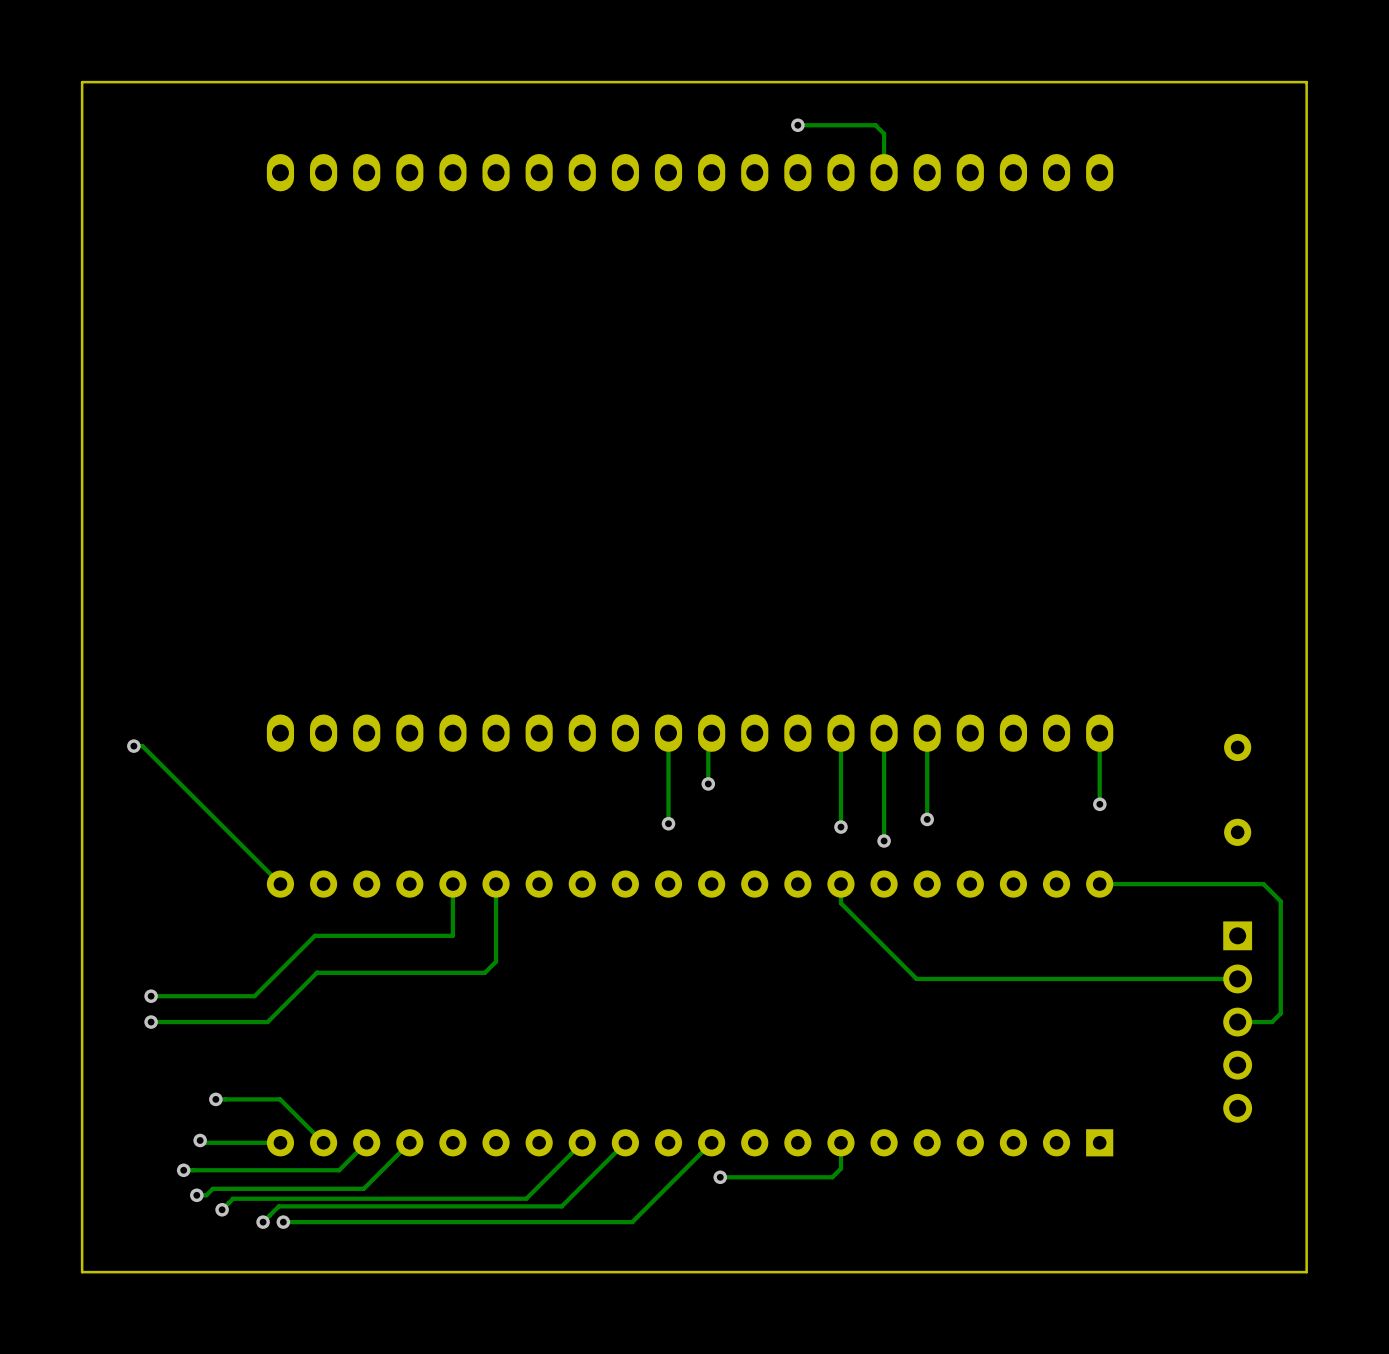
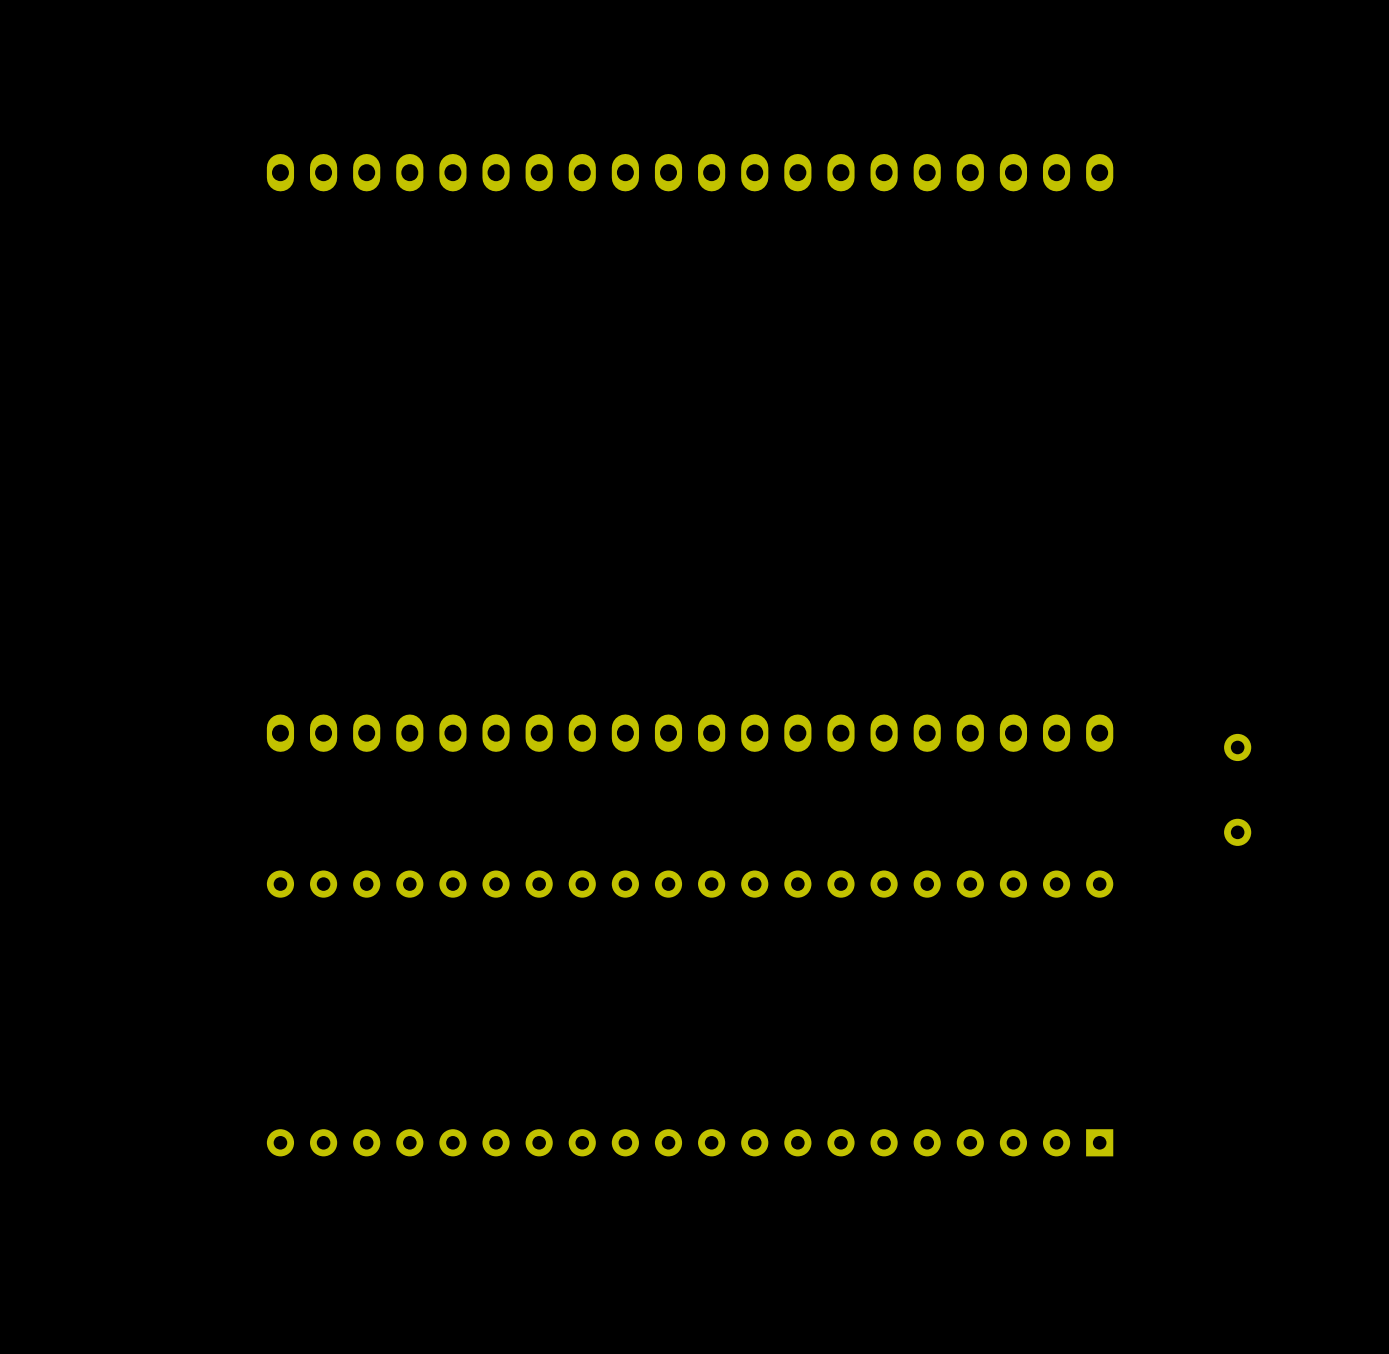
board edge: (1306, 82) (82, 82) (82, 1272) (1306, 1272) (1306, 82) -> none
track: (797, 125) (875, 125) (884, 133) (884, 172) -> none
via: (797, 125) -> none
track: (668, 733) (668, 823) -> none
track: (711, 733) (708, 736) (708, 783) -> none
track: (840, 733) (840, 827) -> none
track: (884, 733) (884, 840) -> none
track: (927, 733) (927, 819) -> none
track: (1099, 733) (1099, 804) -> none
track: (133, 746) (142, 746) (280, 884) -> none
via: (133, 746) -> none
via: (708, 783) -> none
via: (1099, 804) -> none
via: (927, 819) -> none
via: (668, 823) -> none
via: (840, 827) -> none
via: (884, 840) -> none
track: (452, 884) (452, 935) (314, 935) (254, 996) (151, 996) -> none
track: (496, 884) (496, 961) (484, 972) (316, 972) -> none
track: (840, 884) (840, 903) (916, 978) (1237, 978) -> none
track: (1099, 884) (1263, 884) (1280, 901) (1280, 1013) (1272, 1022) (1237, 1022) -> none
track: (317, 972) (267, 1022) (151, 1022) -> none
via: (151, 996) -> none
via: (151, 1022) -> none
part: (1237, 1022) -> none
track: (215, 1099) (280, 1099) (323, 1142) -> none
via: (215, 1099) -> none
track: (200, 1140) (202, 1142) (280, 1142) -> none
via: (200, 1140) -> none
track: (366, 1142) (339, 1170) (183, 1170) -> none
track: (409, 1142) (363, 1188) (212, 1188) (206, 1195) (196, 1195) -> none
track: (582, 1142) (526, 1198) (233, 1198) (222, 1209) -> none
track: (625, 1142) (561, 1206) (278, 1206) (263, 1222) -> none
track: (711, 1142) (632, 1222) (283, 1222) -> none
track: (840, 1142) (840, 1168) (832, 1177) (720, 1177) -> none
via: (183, 1170) -> none
via: (720, 1177) -> none
via: (196, 1195) -> none
via: (222, 1209) -> none
via: (263, 1222) -> none
via: (283, 1222) -> none

